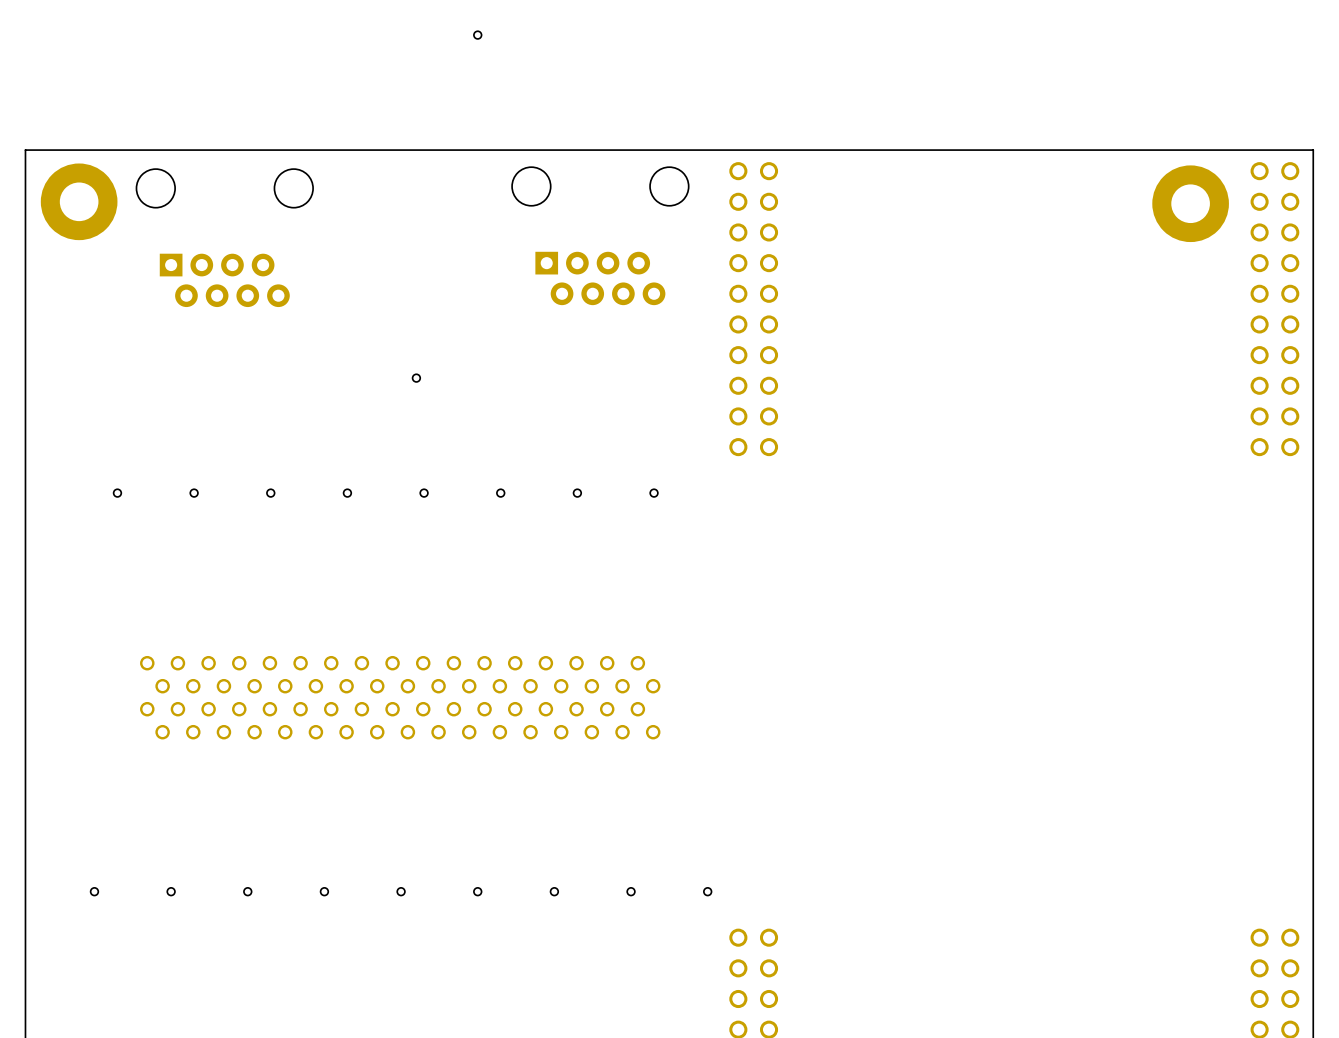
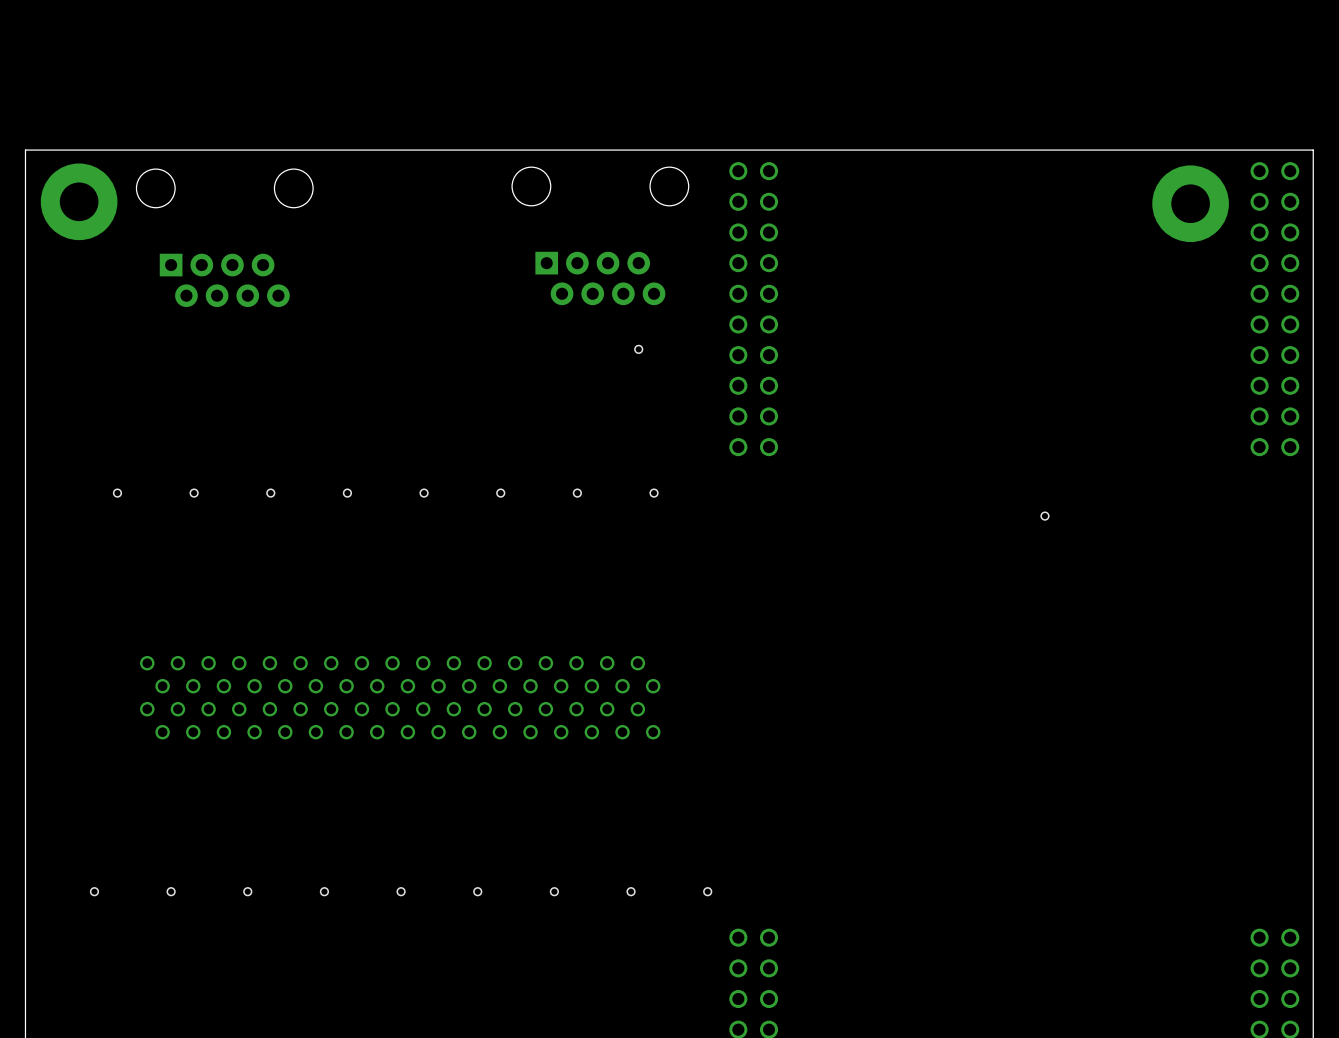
part: (477, 35) -> none
part: none -> (638, 349)
part: (416, 378) -> none
part: none -> (1044, 516)

